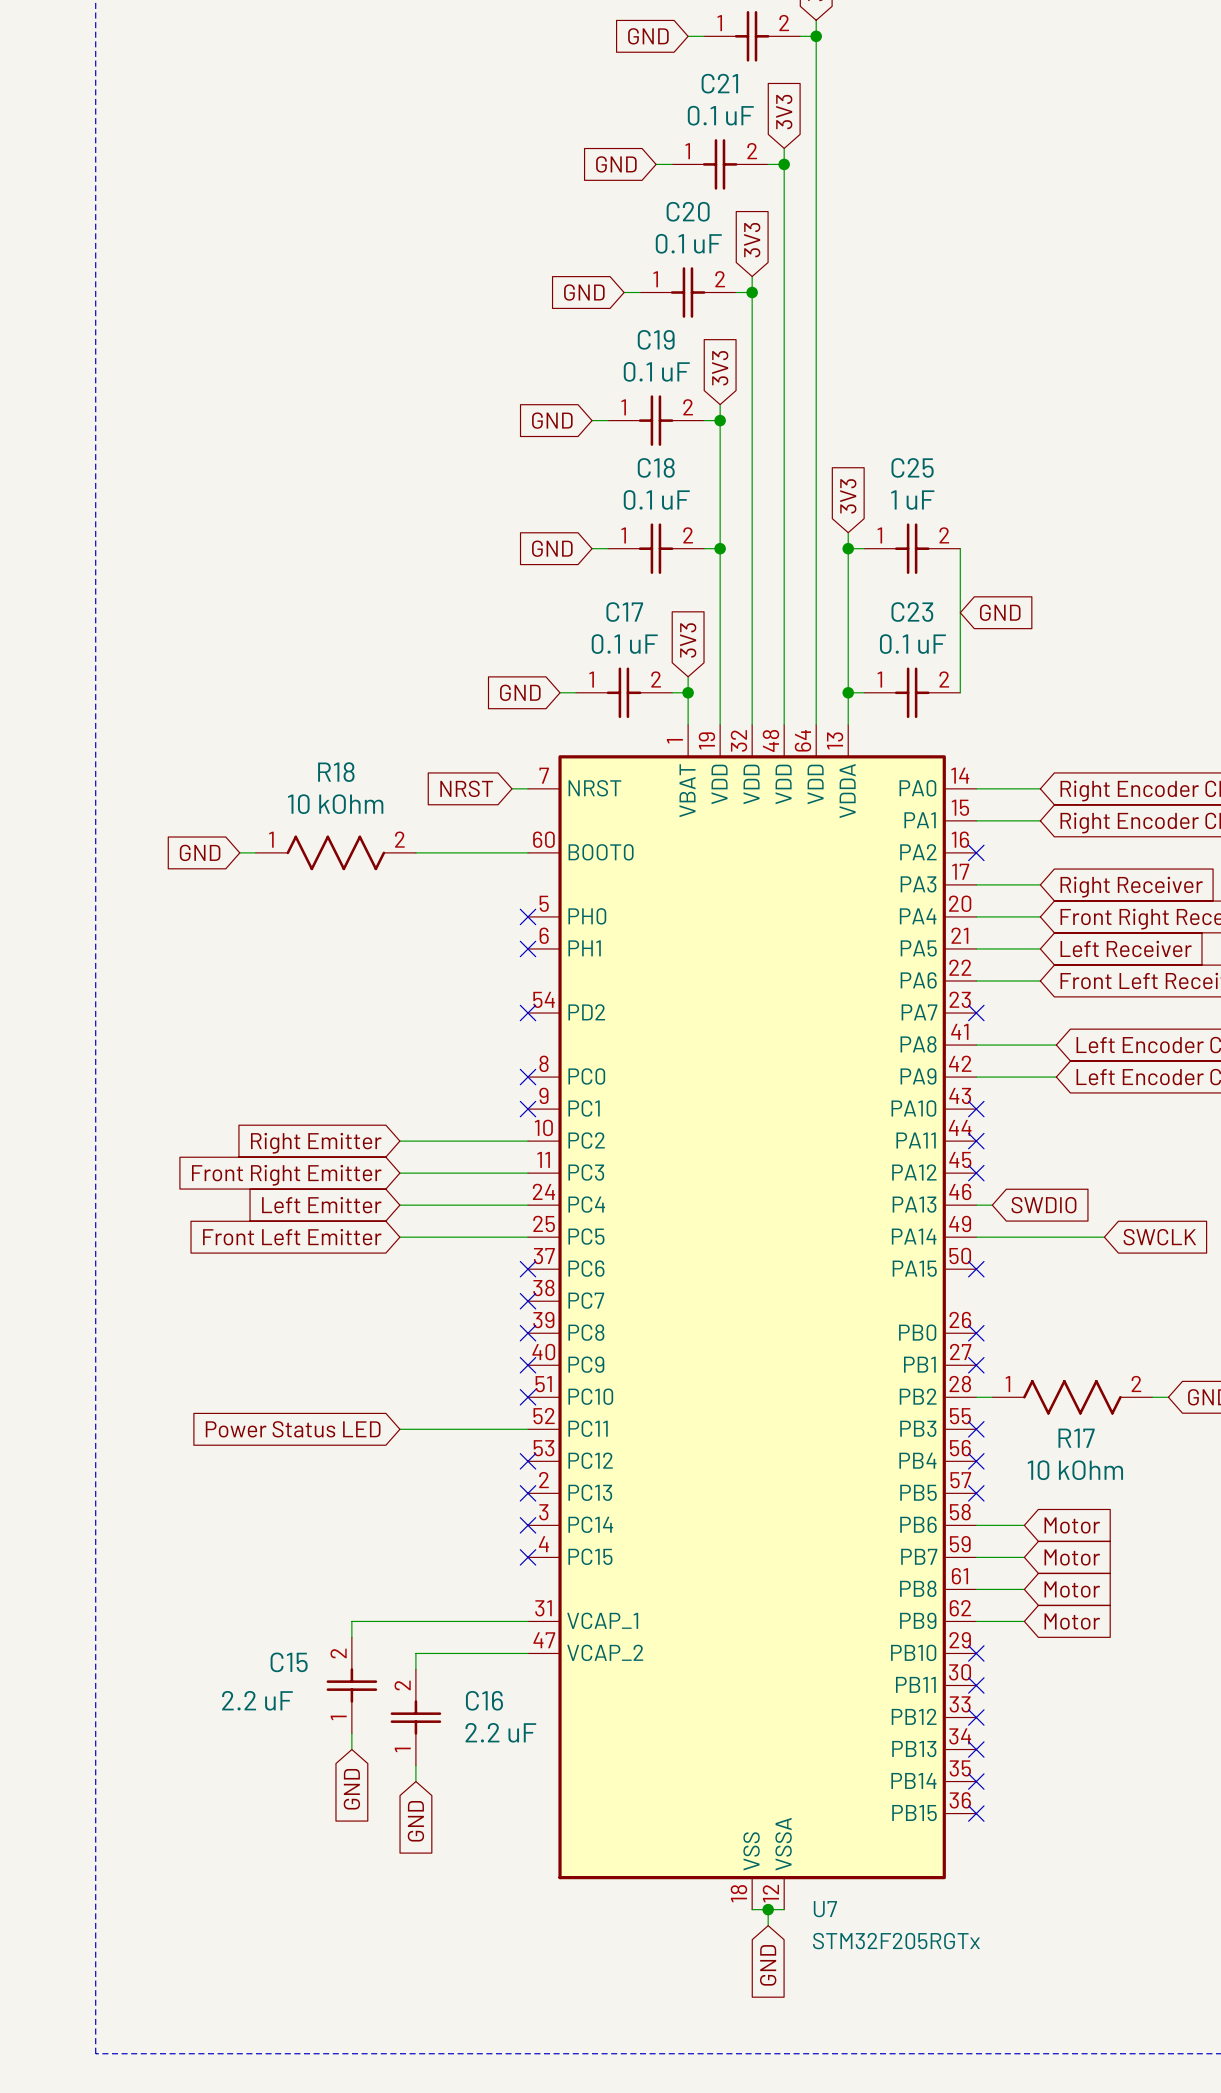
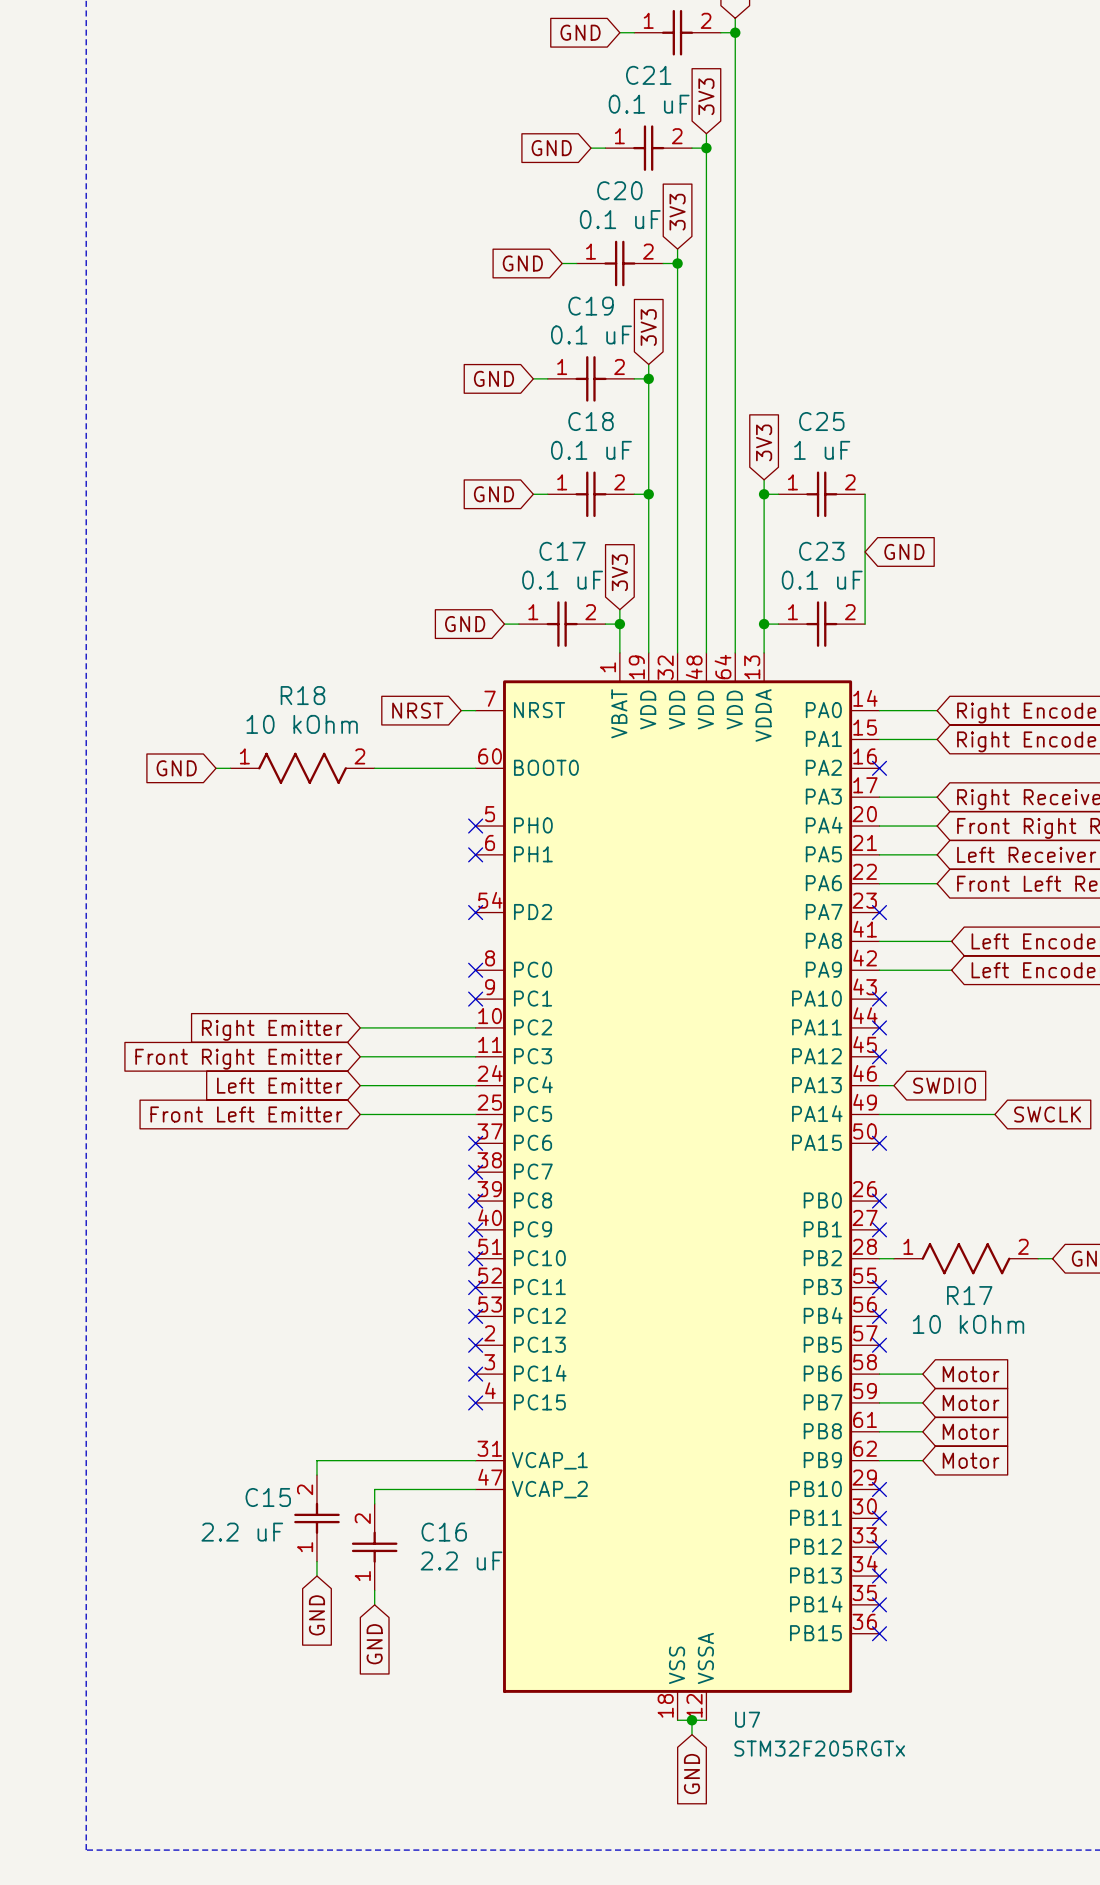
global label: Power Status LED (293, 1429) -> none
wire: (399, 1429) (528, 1429) -> none
no-connect mark: none -> (475, 1287)

